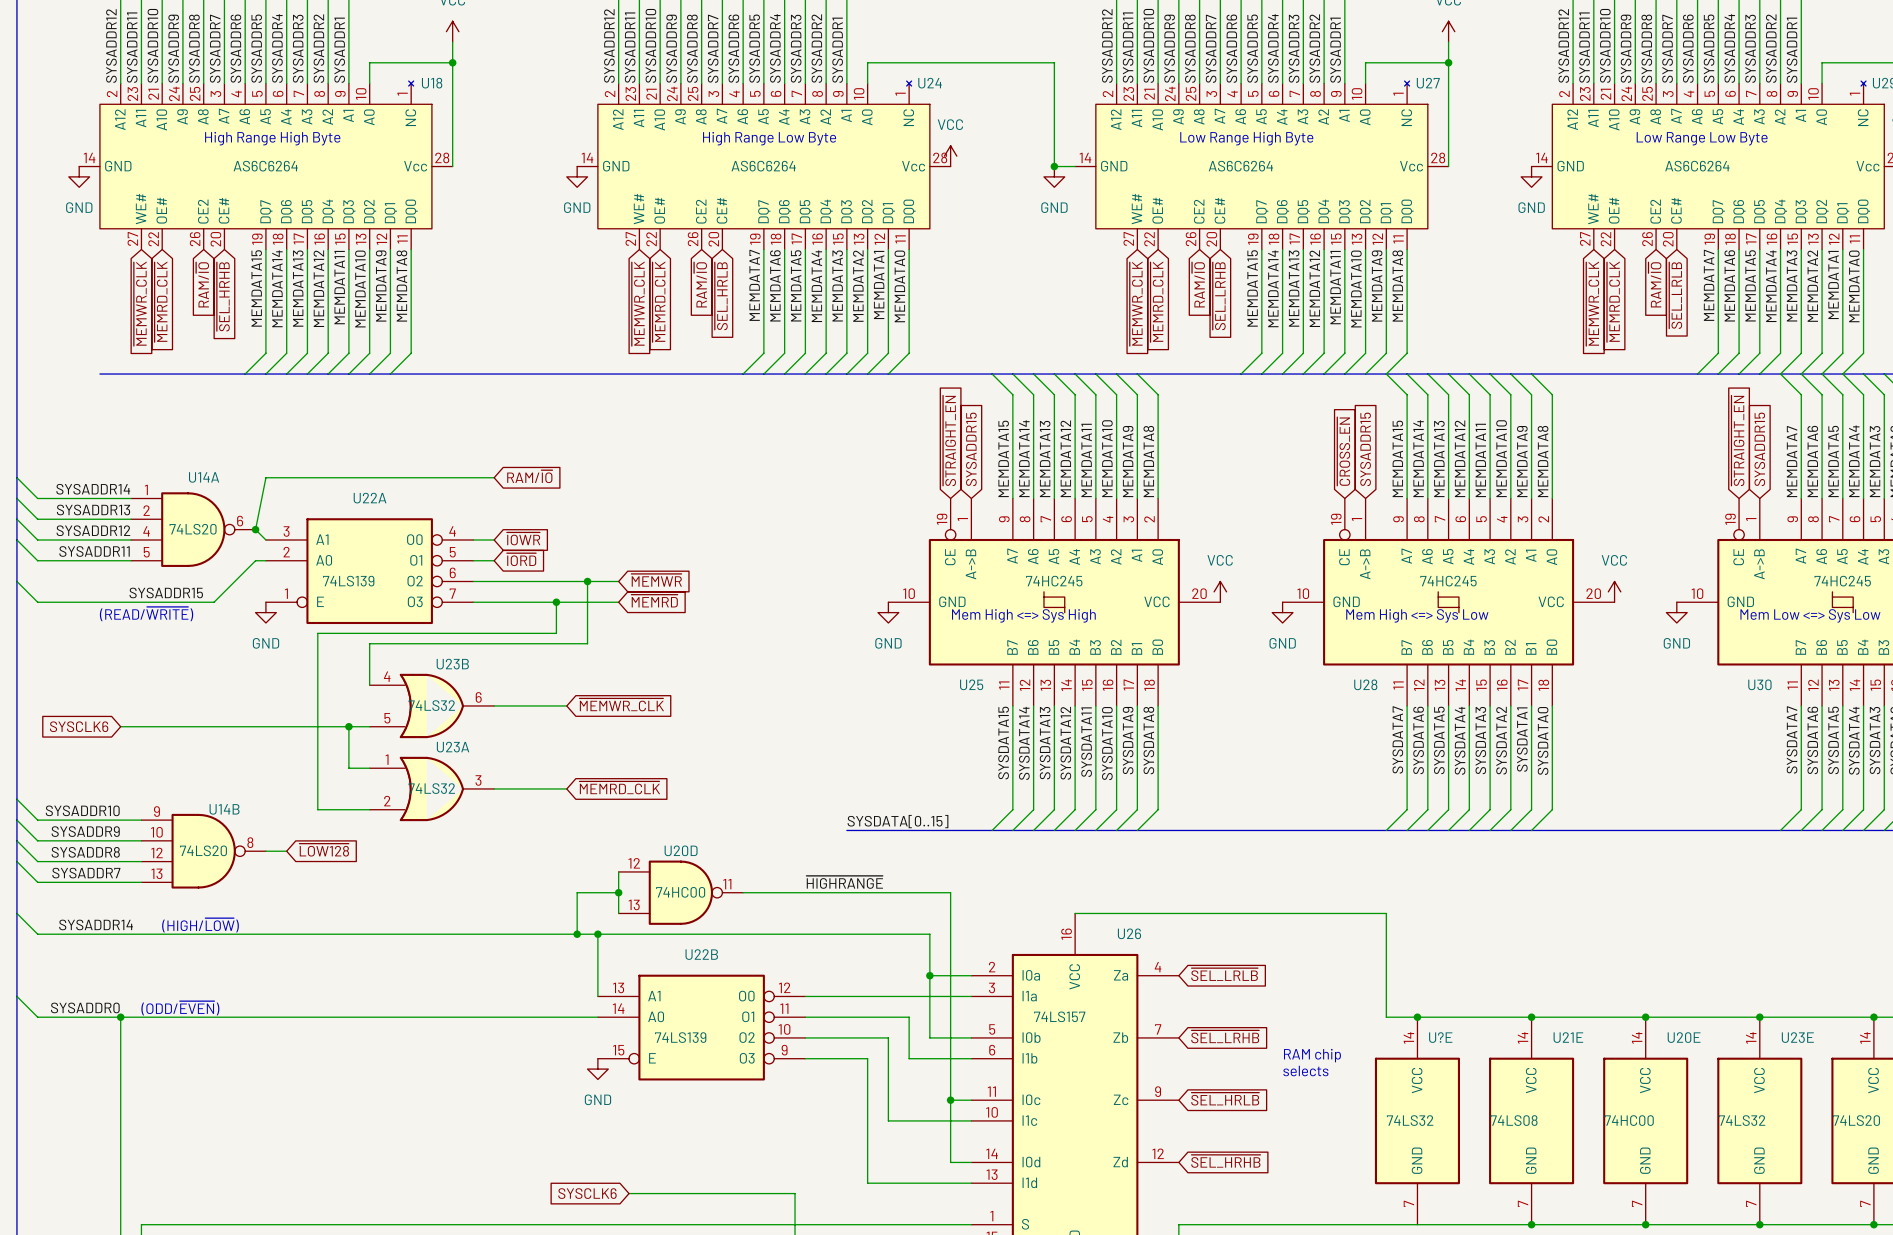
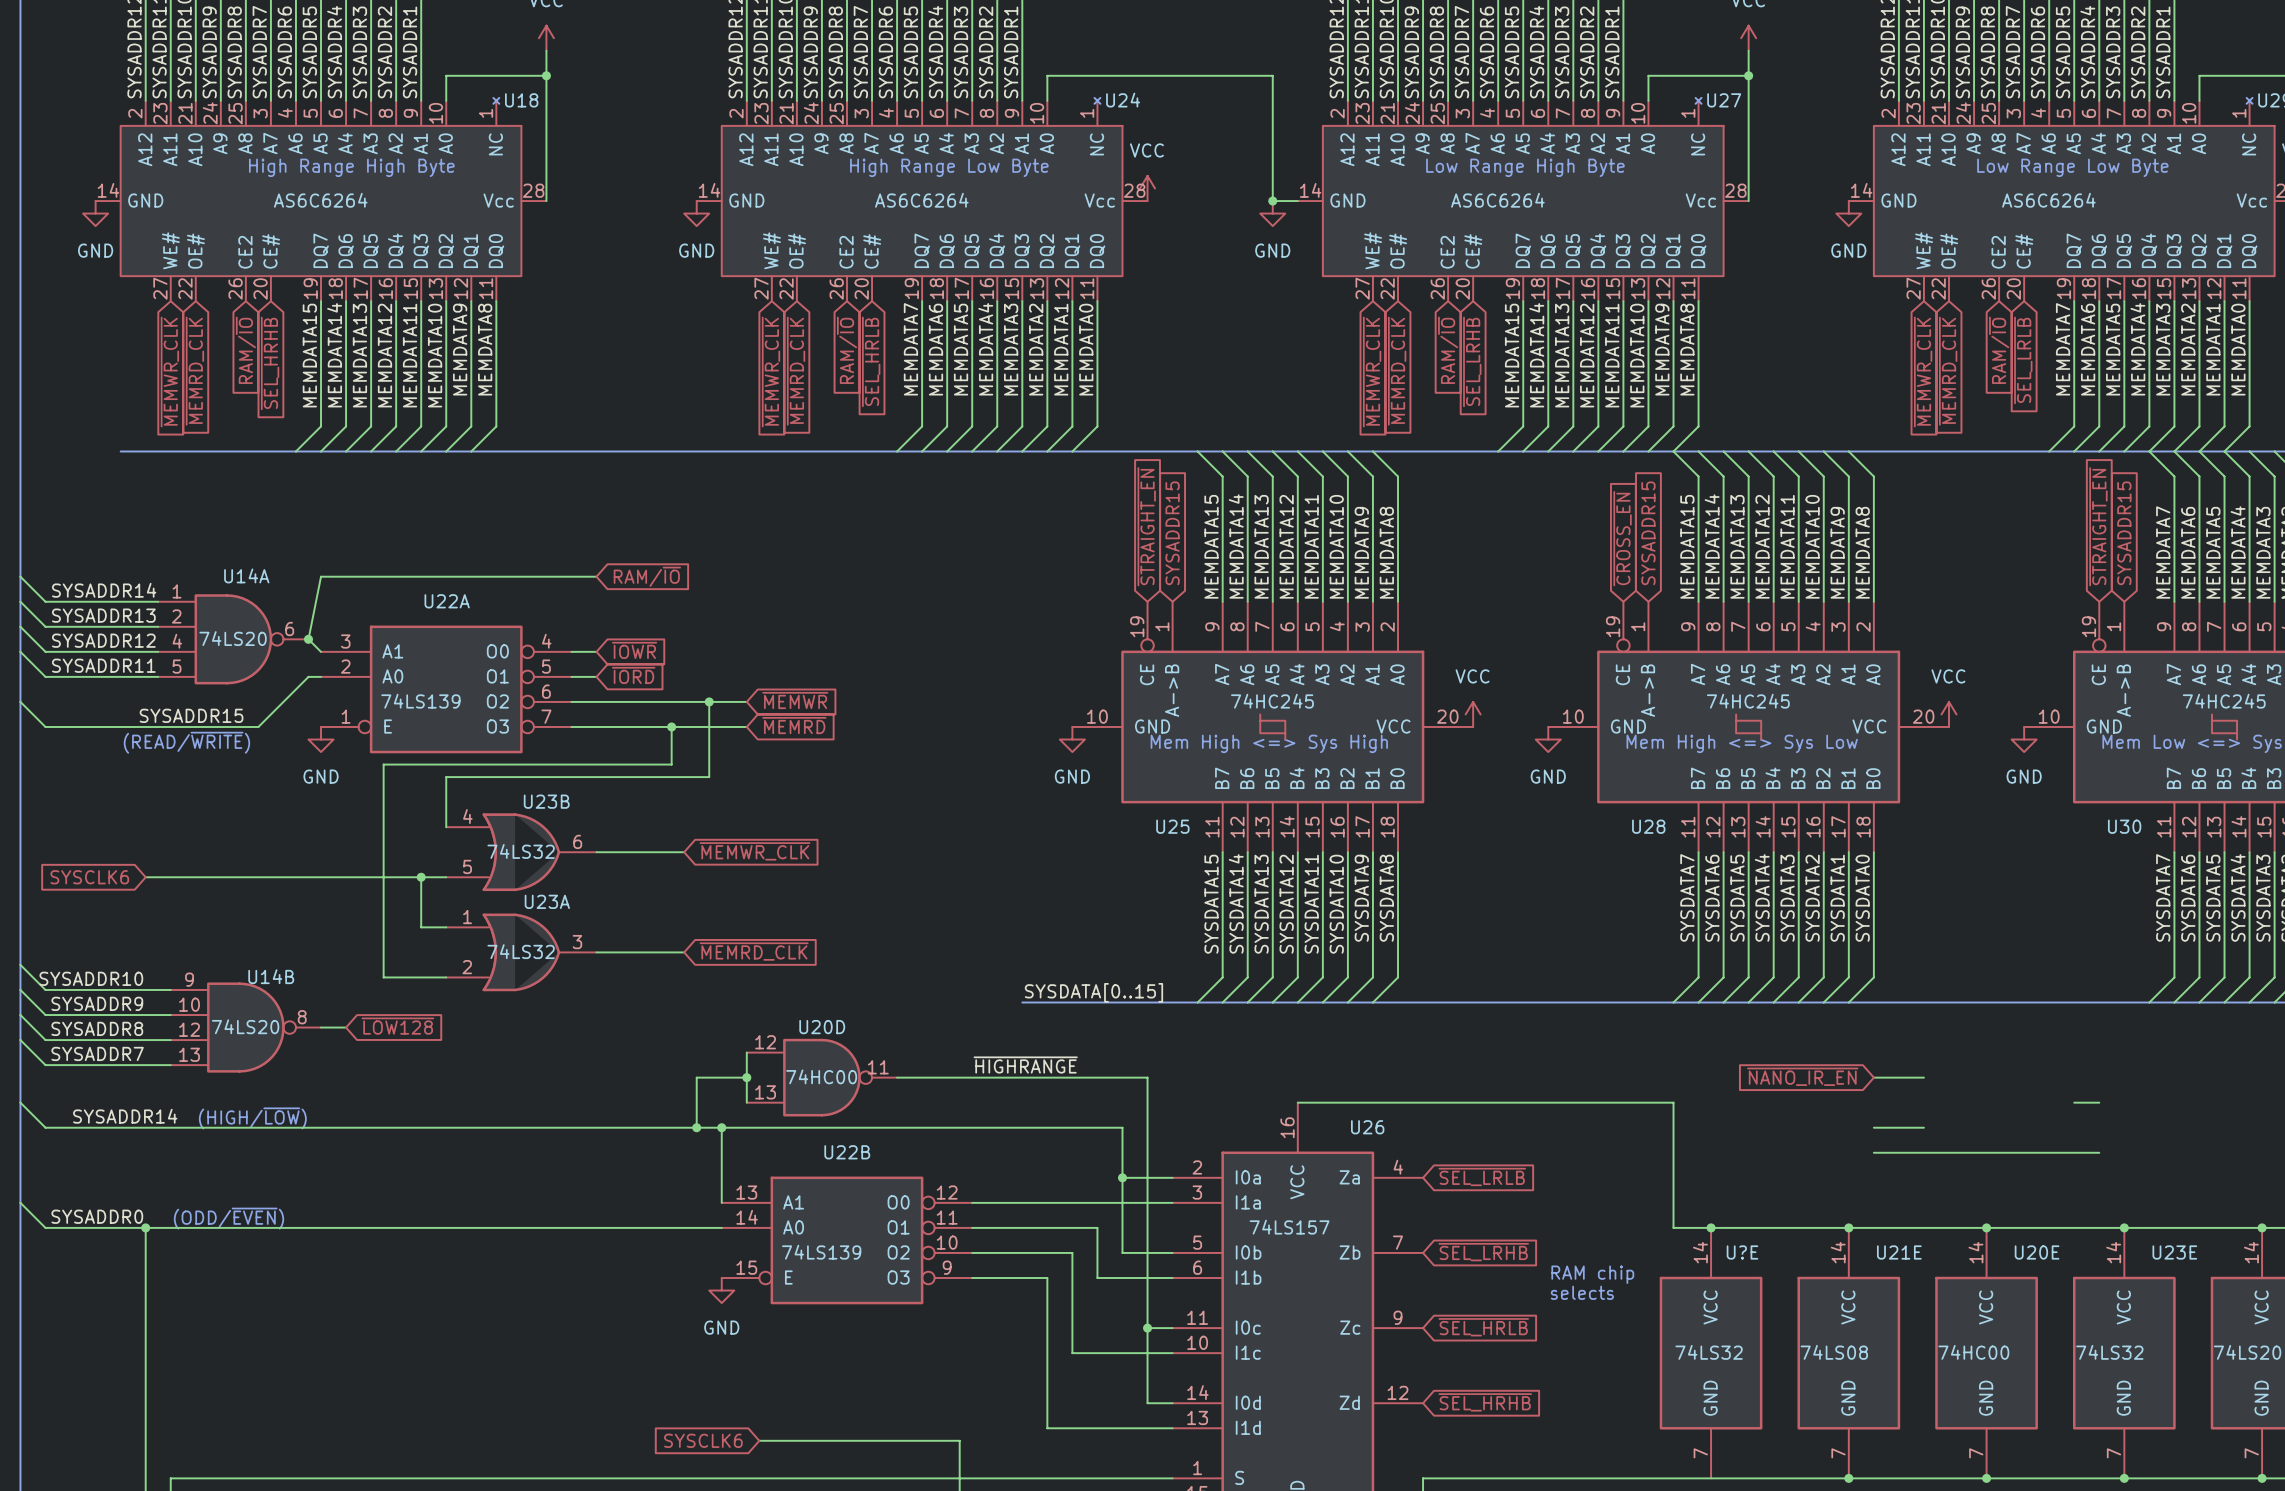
global label: none -> ~{NANO_IR_EN} (1802, 1076)
wire: none -> (1873, 1077) (1923, 1077)
wire: none -> (2074, 1102) (2099, 1102)
wire: none -> (1873, 1127) (1923, 1127)
wire: none -> (1873, 1152) (2099, 1152)

